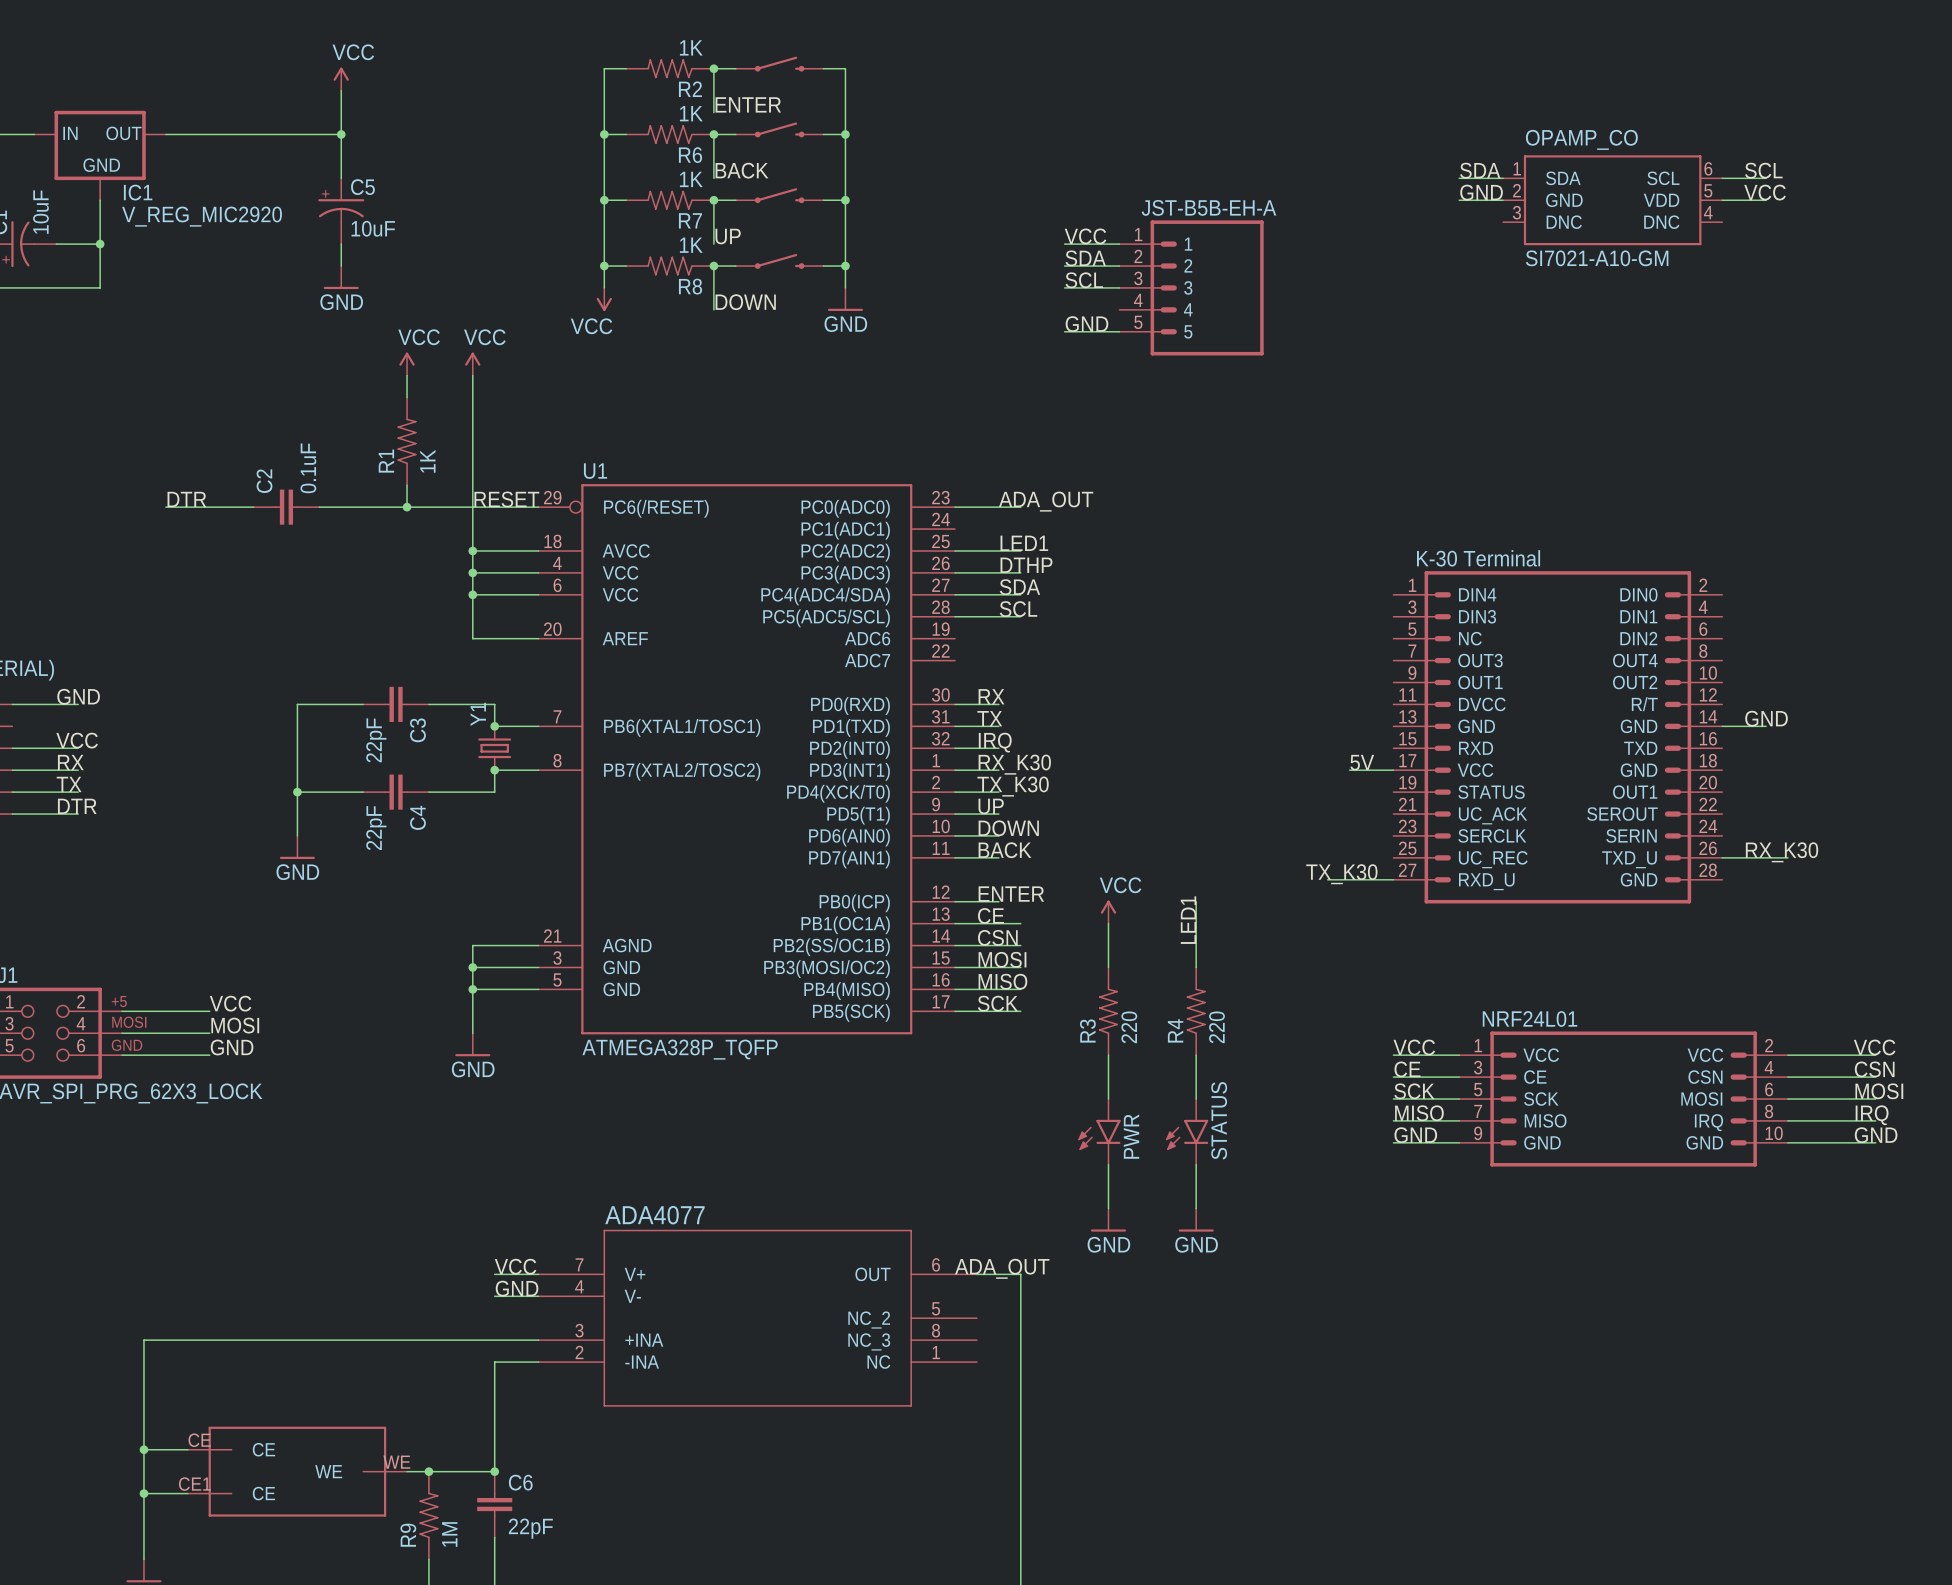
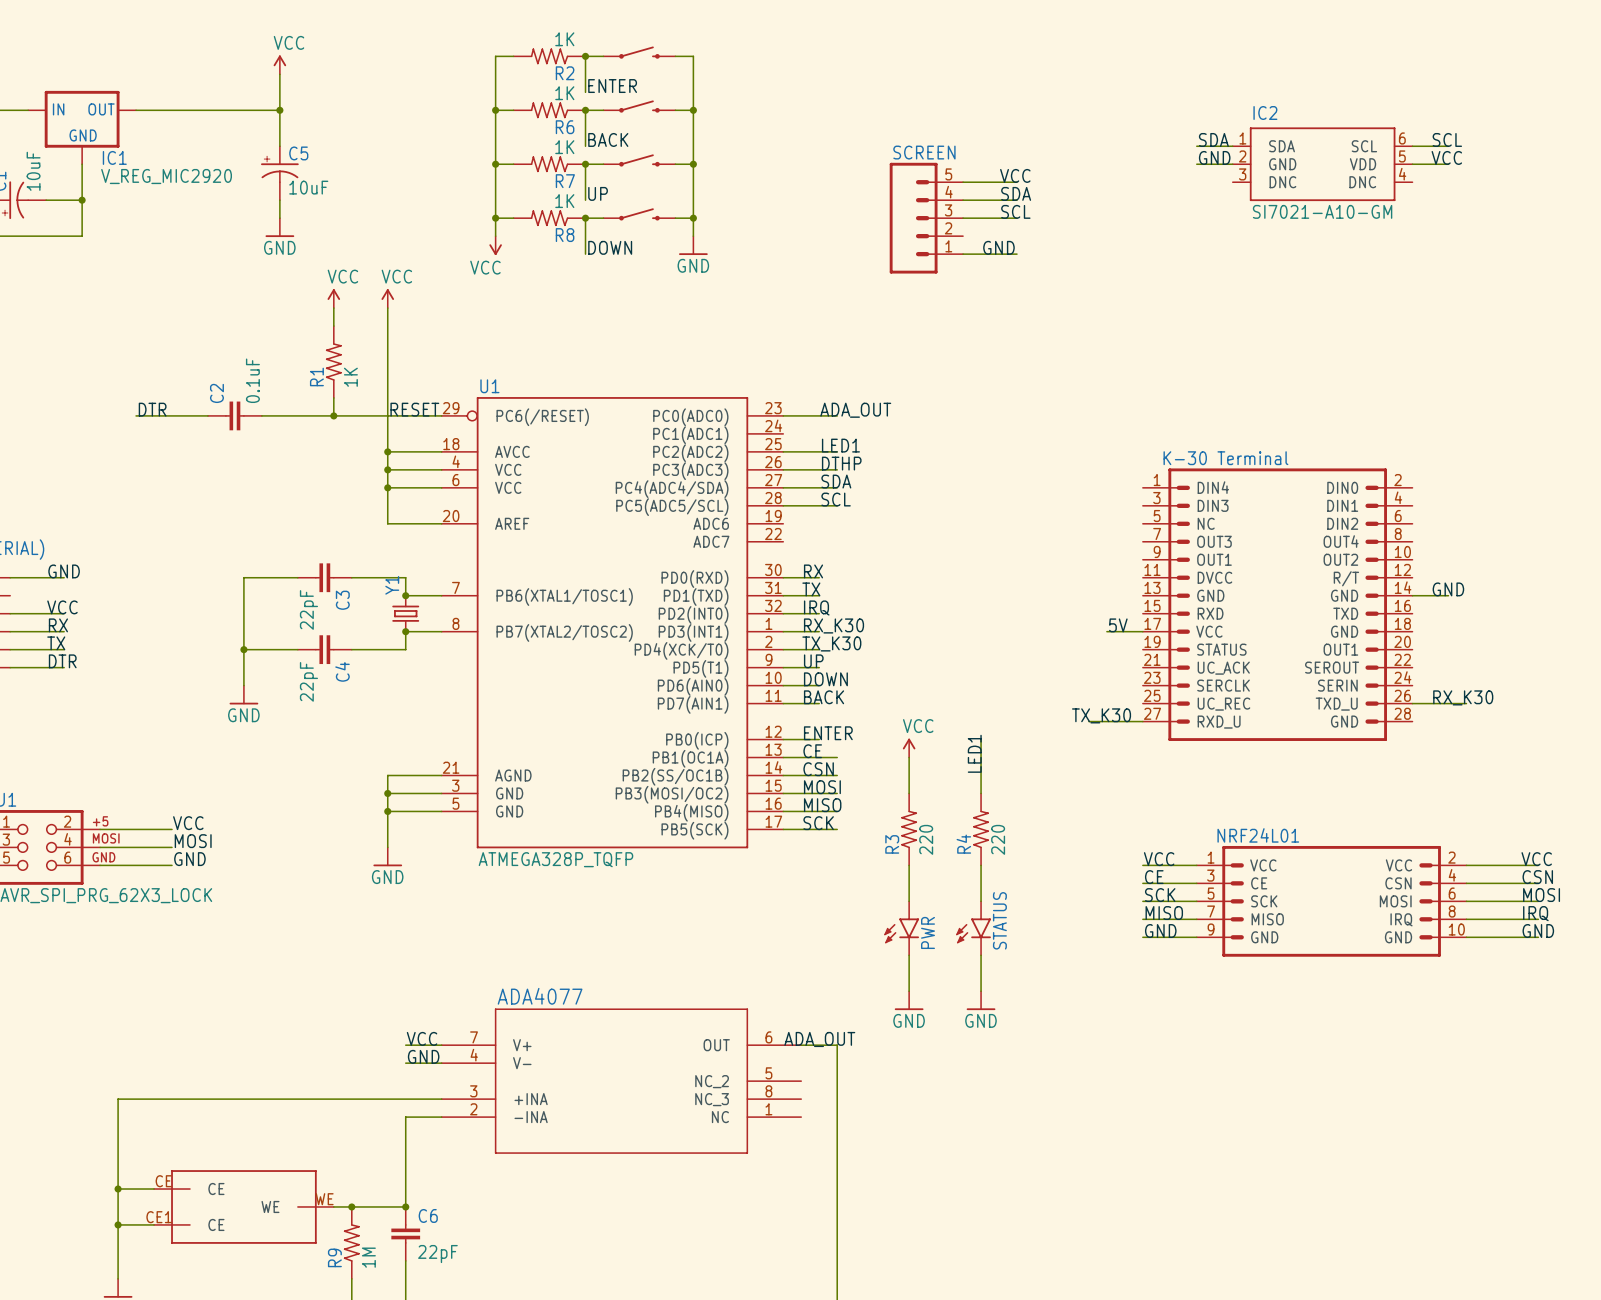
OPAMP_CO name: OPAMP_CO (1581, 139) -> IC2 (1265, 113)
label position: VCC (1085, 236) -> VCC (1015, 175)
wire: (1064, 244) (1119, 244) -> none
wire: none -> (963, 200) (1016, 200)
label position: SDA (1085, 258) -> SDA (1016, 193)
wire: (1064, 266) (1119, 266) -> none
SCREEN: none -> (926, 218)
wire: none -> (963, 218) (1016, 218)
label position: SCL (1084, 280) -> SCL (1015, 211)
wire: (1064, 287) (1119, 287) -> none
part: (1191, 287) -> none
wire: none -> (963, 254) (1016, 254)
label position: GND (1086, 324) -> GND (998, 247)

